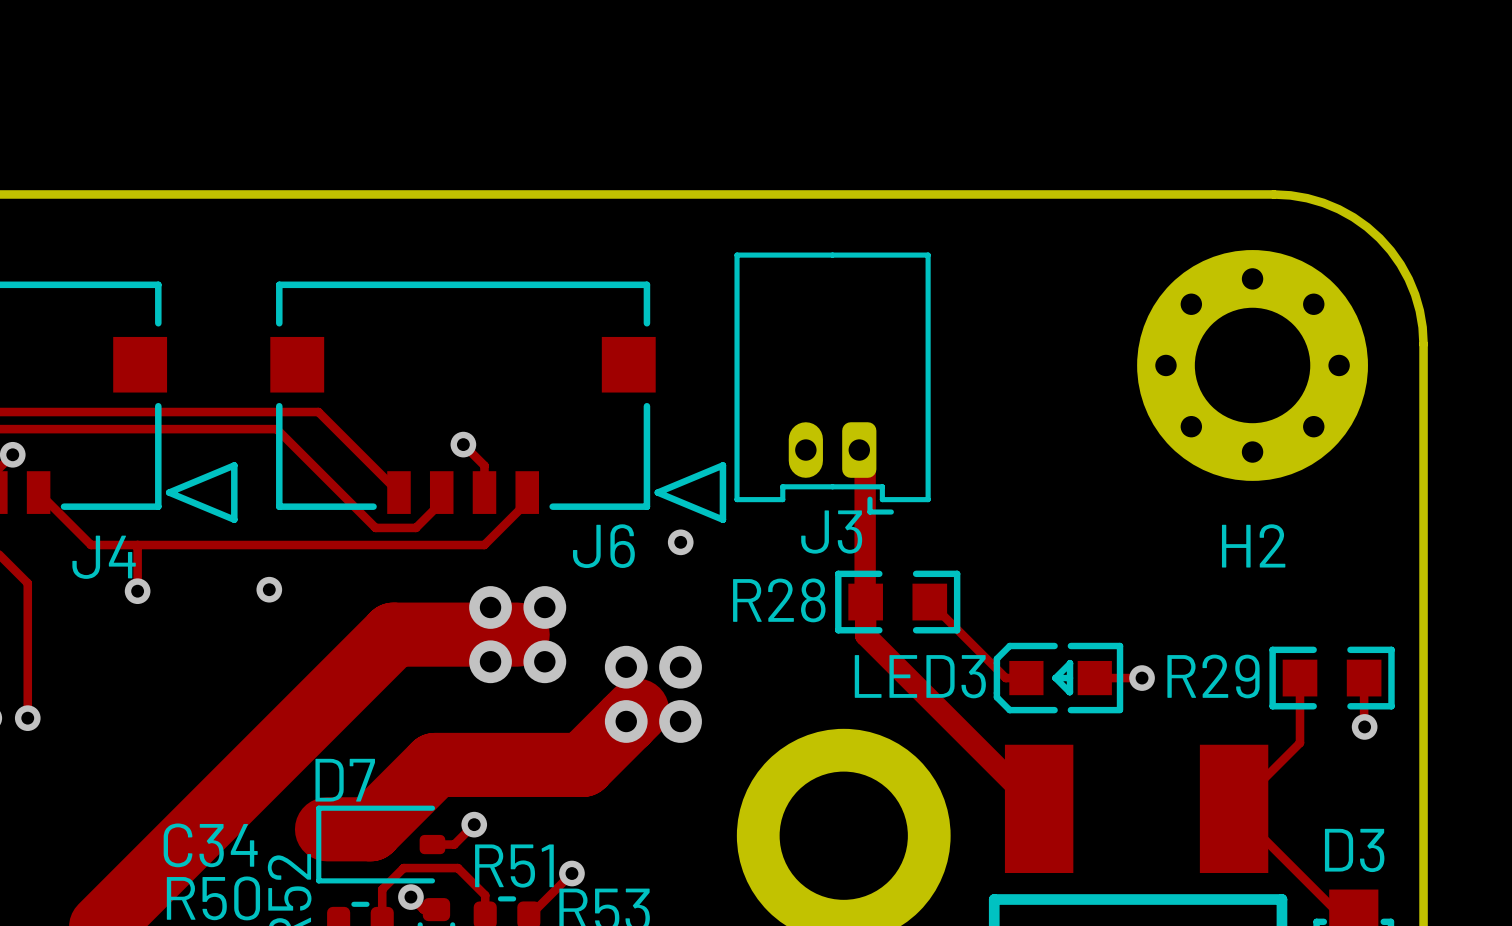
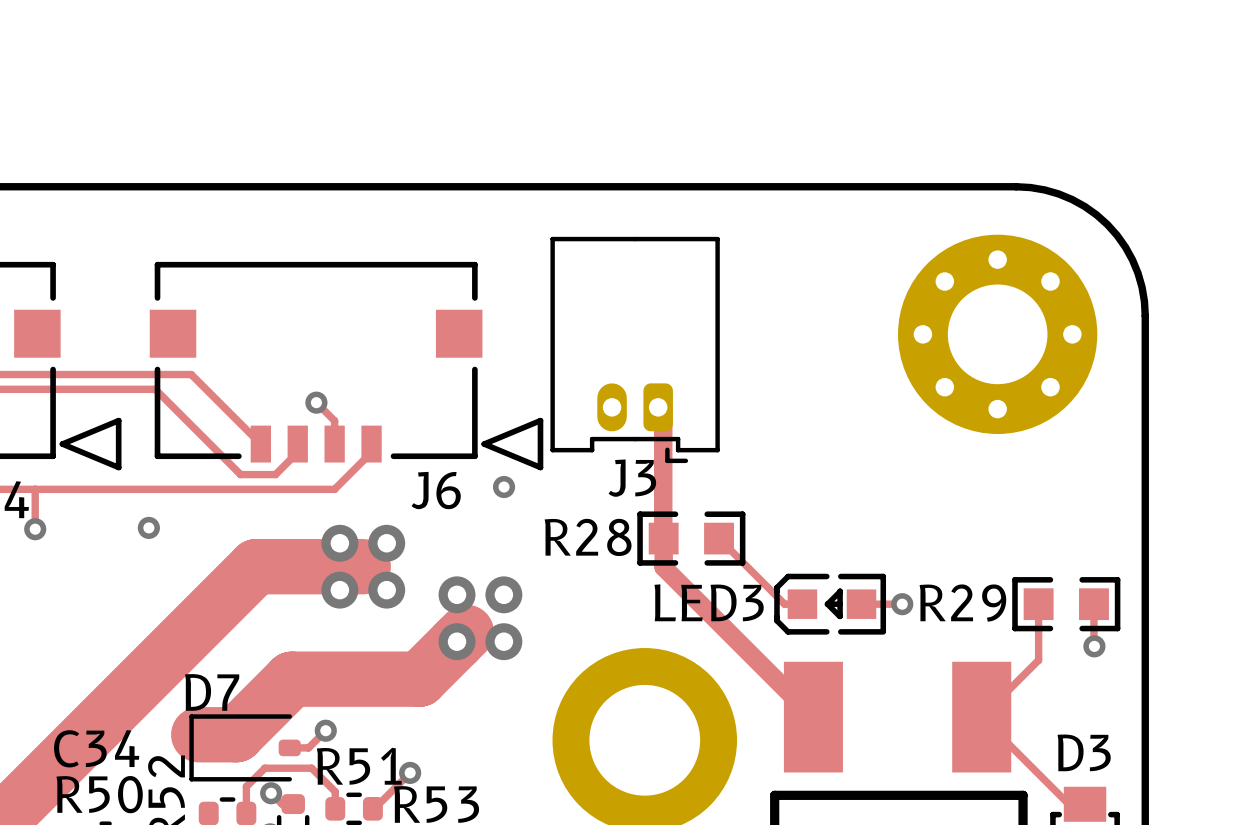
H2 name: H2 (1253, 545) -> none

